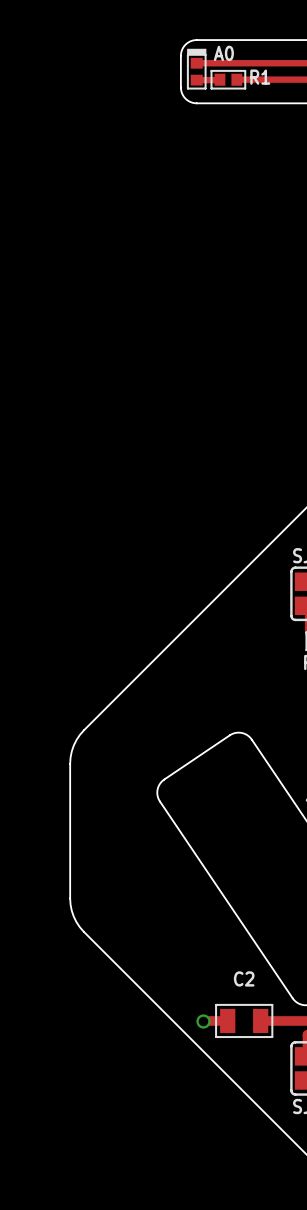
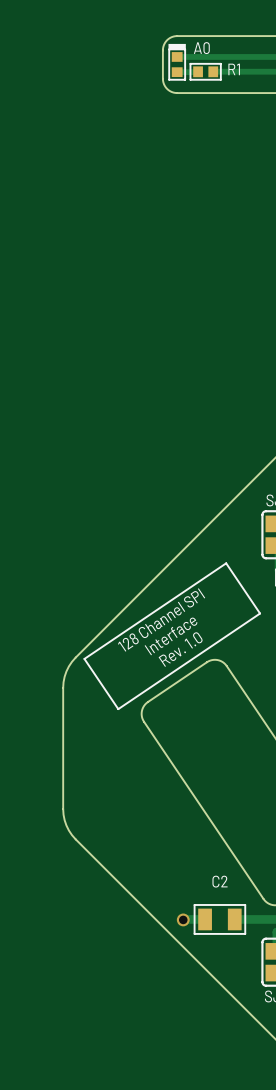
line: none -> (226, 563) (260, 613) (118, 709) (84, 658) (226, 563)
text: none -> 128 Channel SPI (161, 619)
text: none -> Interface (171, 636)
text: none -> Rev. 1.0 (180, 649)

